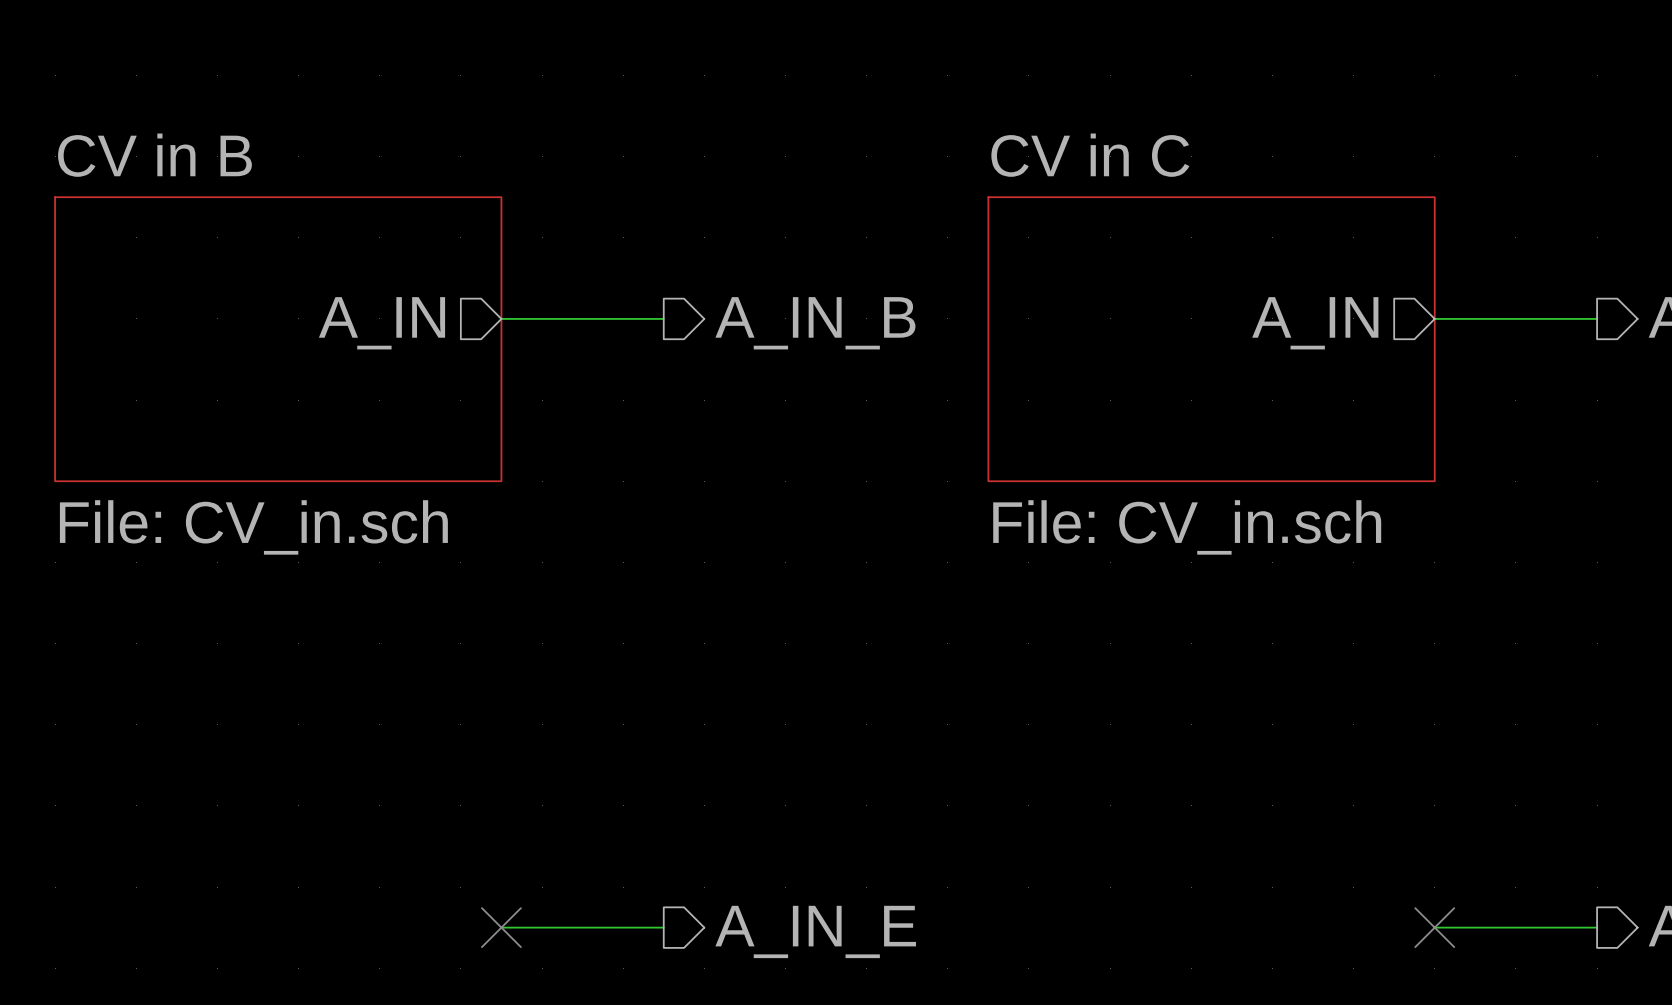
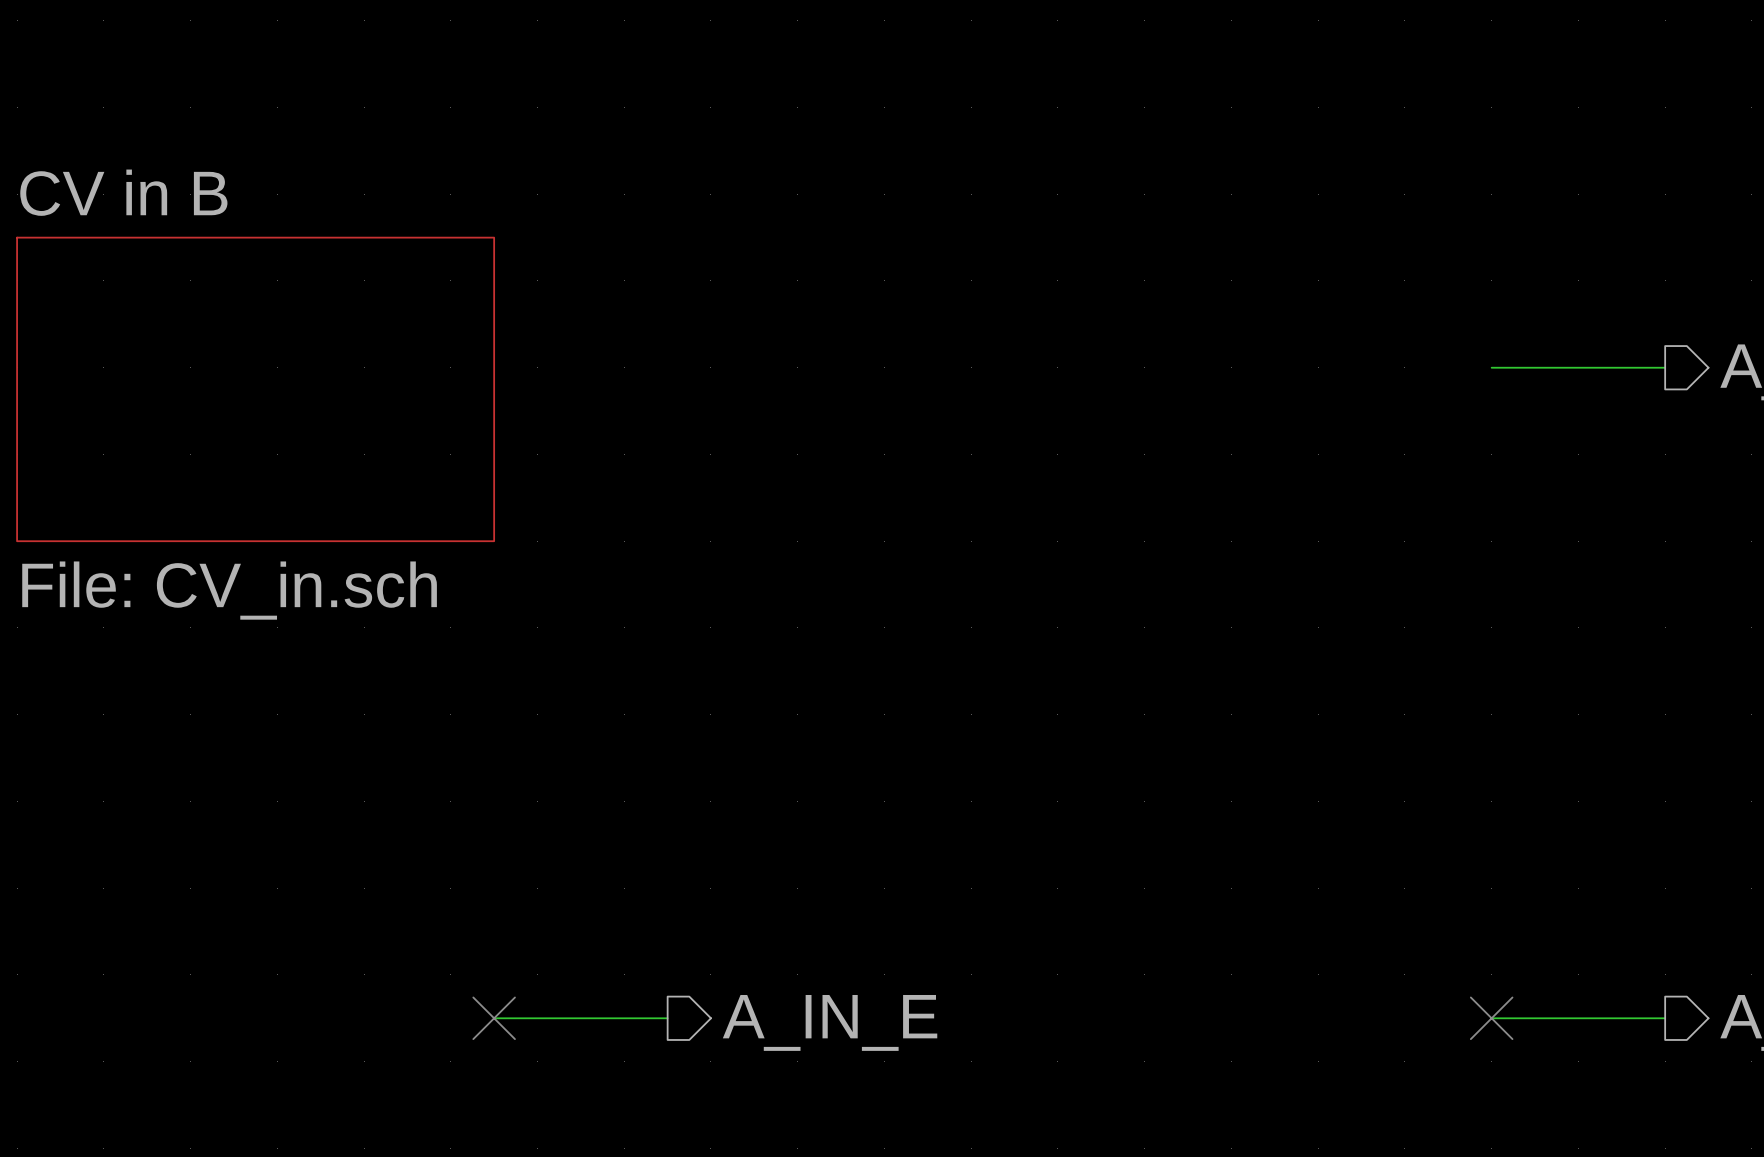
wire: (501, 318) (663, 318) -> none
sheet pin: A_IN (381, 323) -> none
hierarchical label: A_IN_B (815, 323) -> none
sheet pin: A_IN (1315, 323) -> none
sheet CV in C: File: CV_in.sch (1211, 339) -> none

